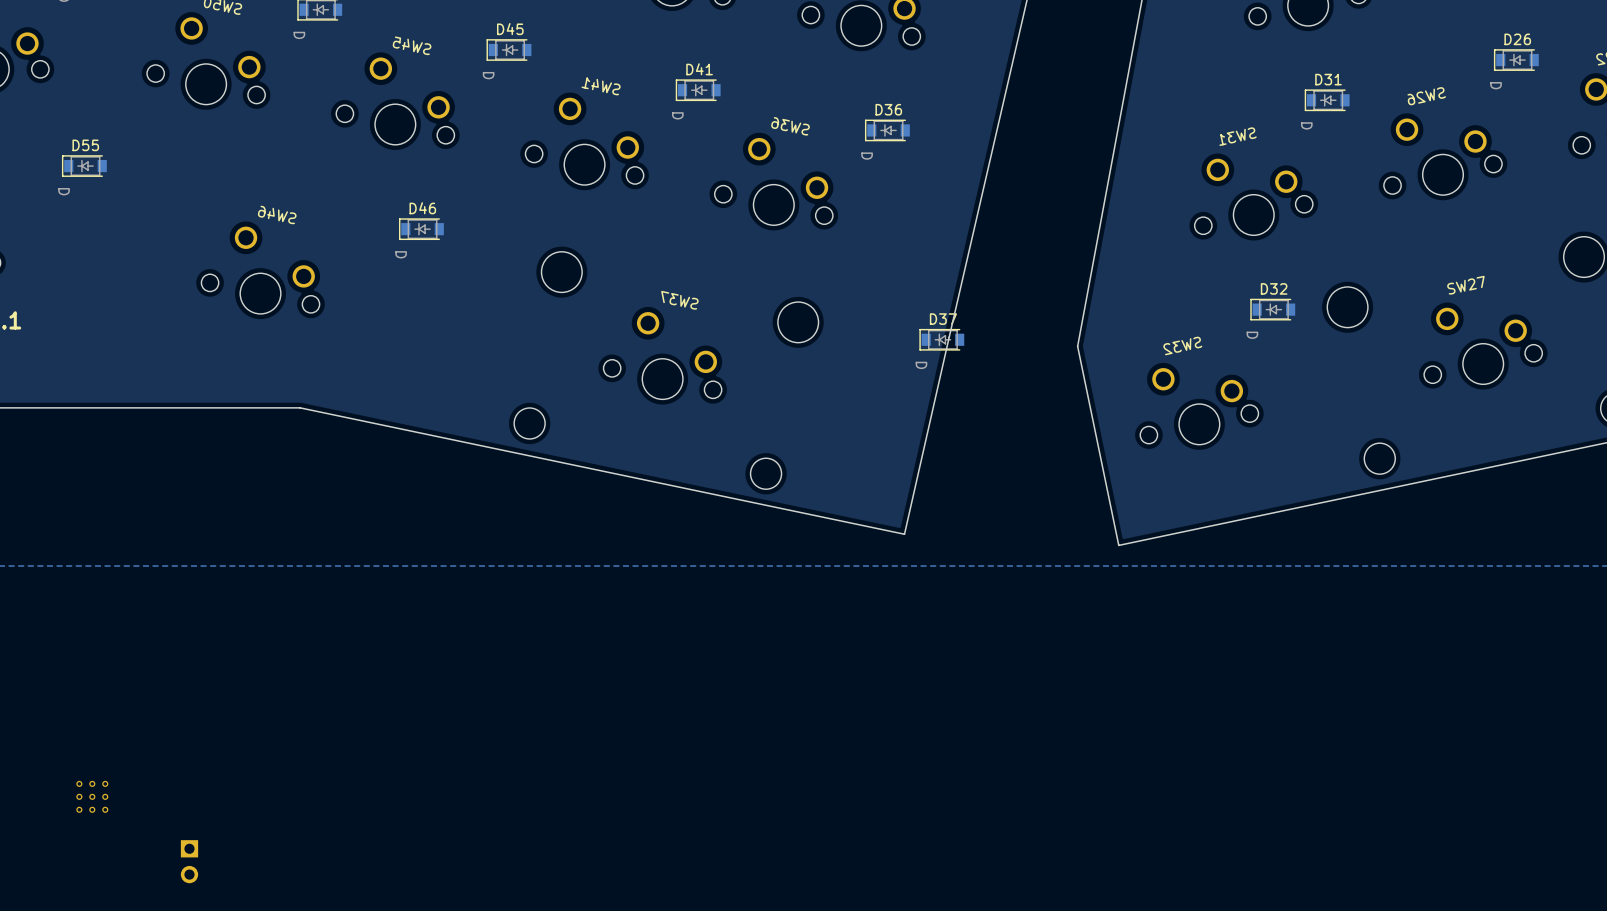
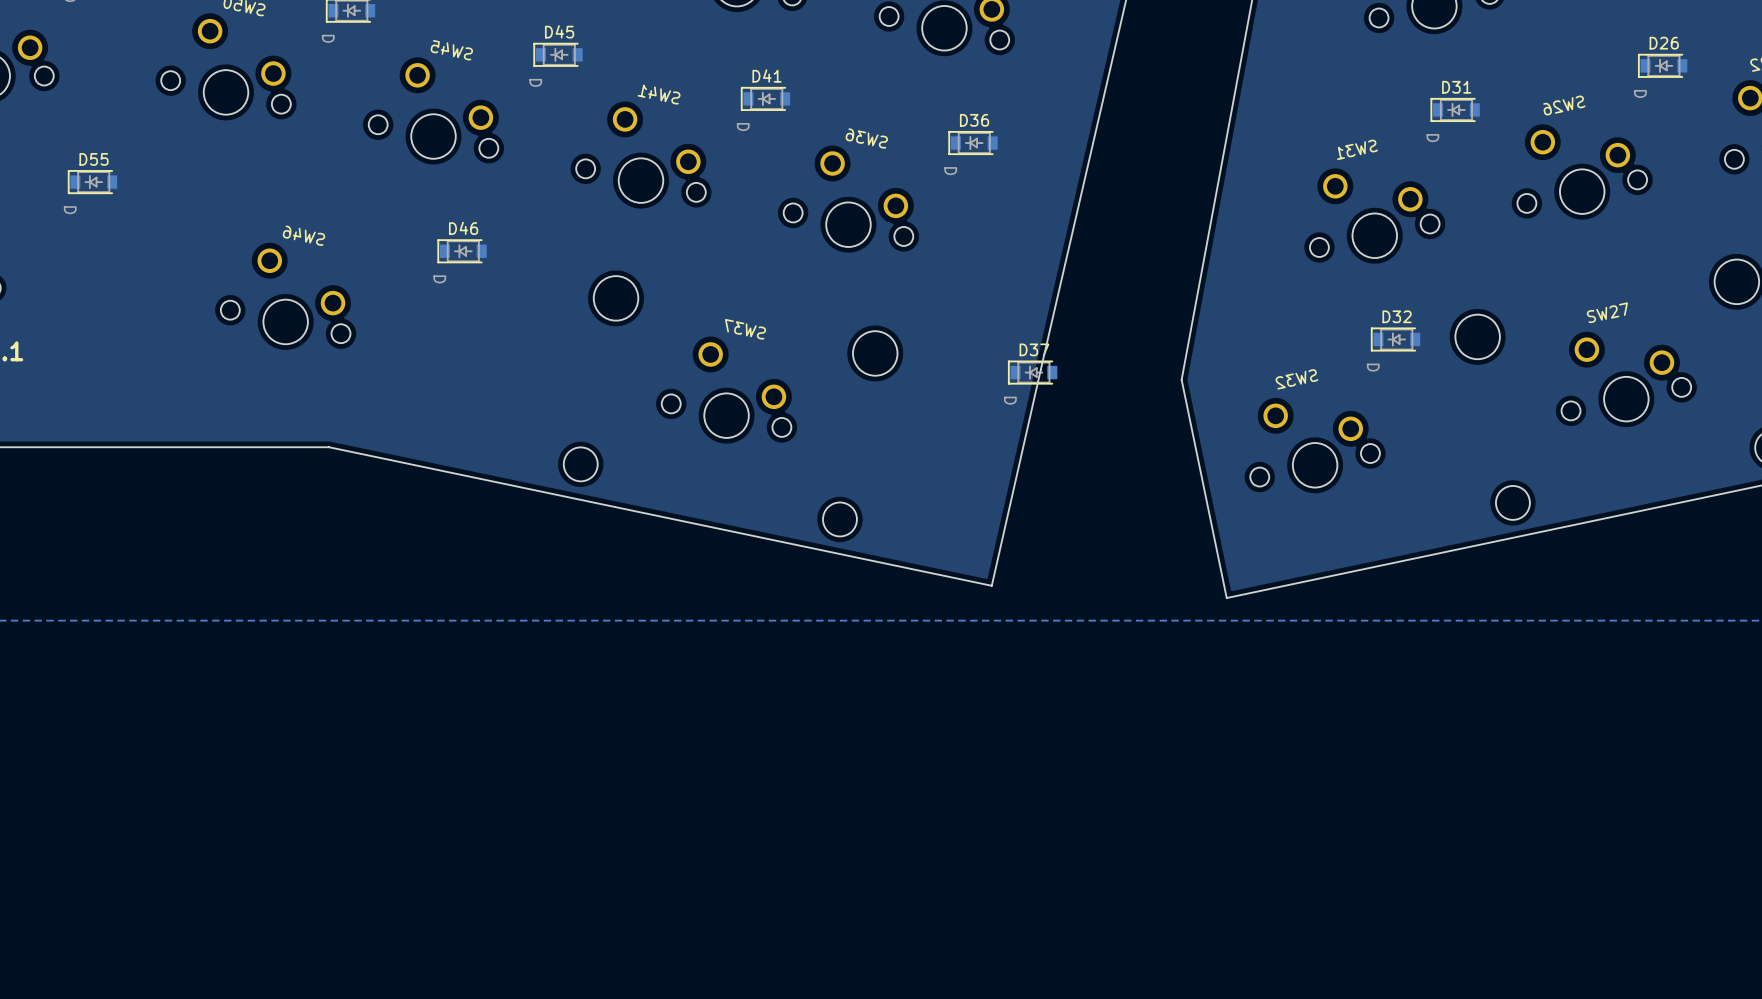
part: (92, 796) -> none
part: (189, 861) -> none

